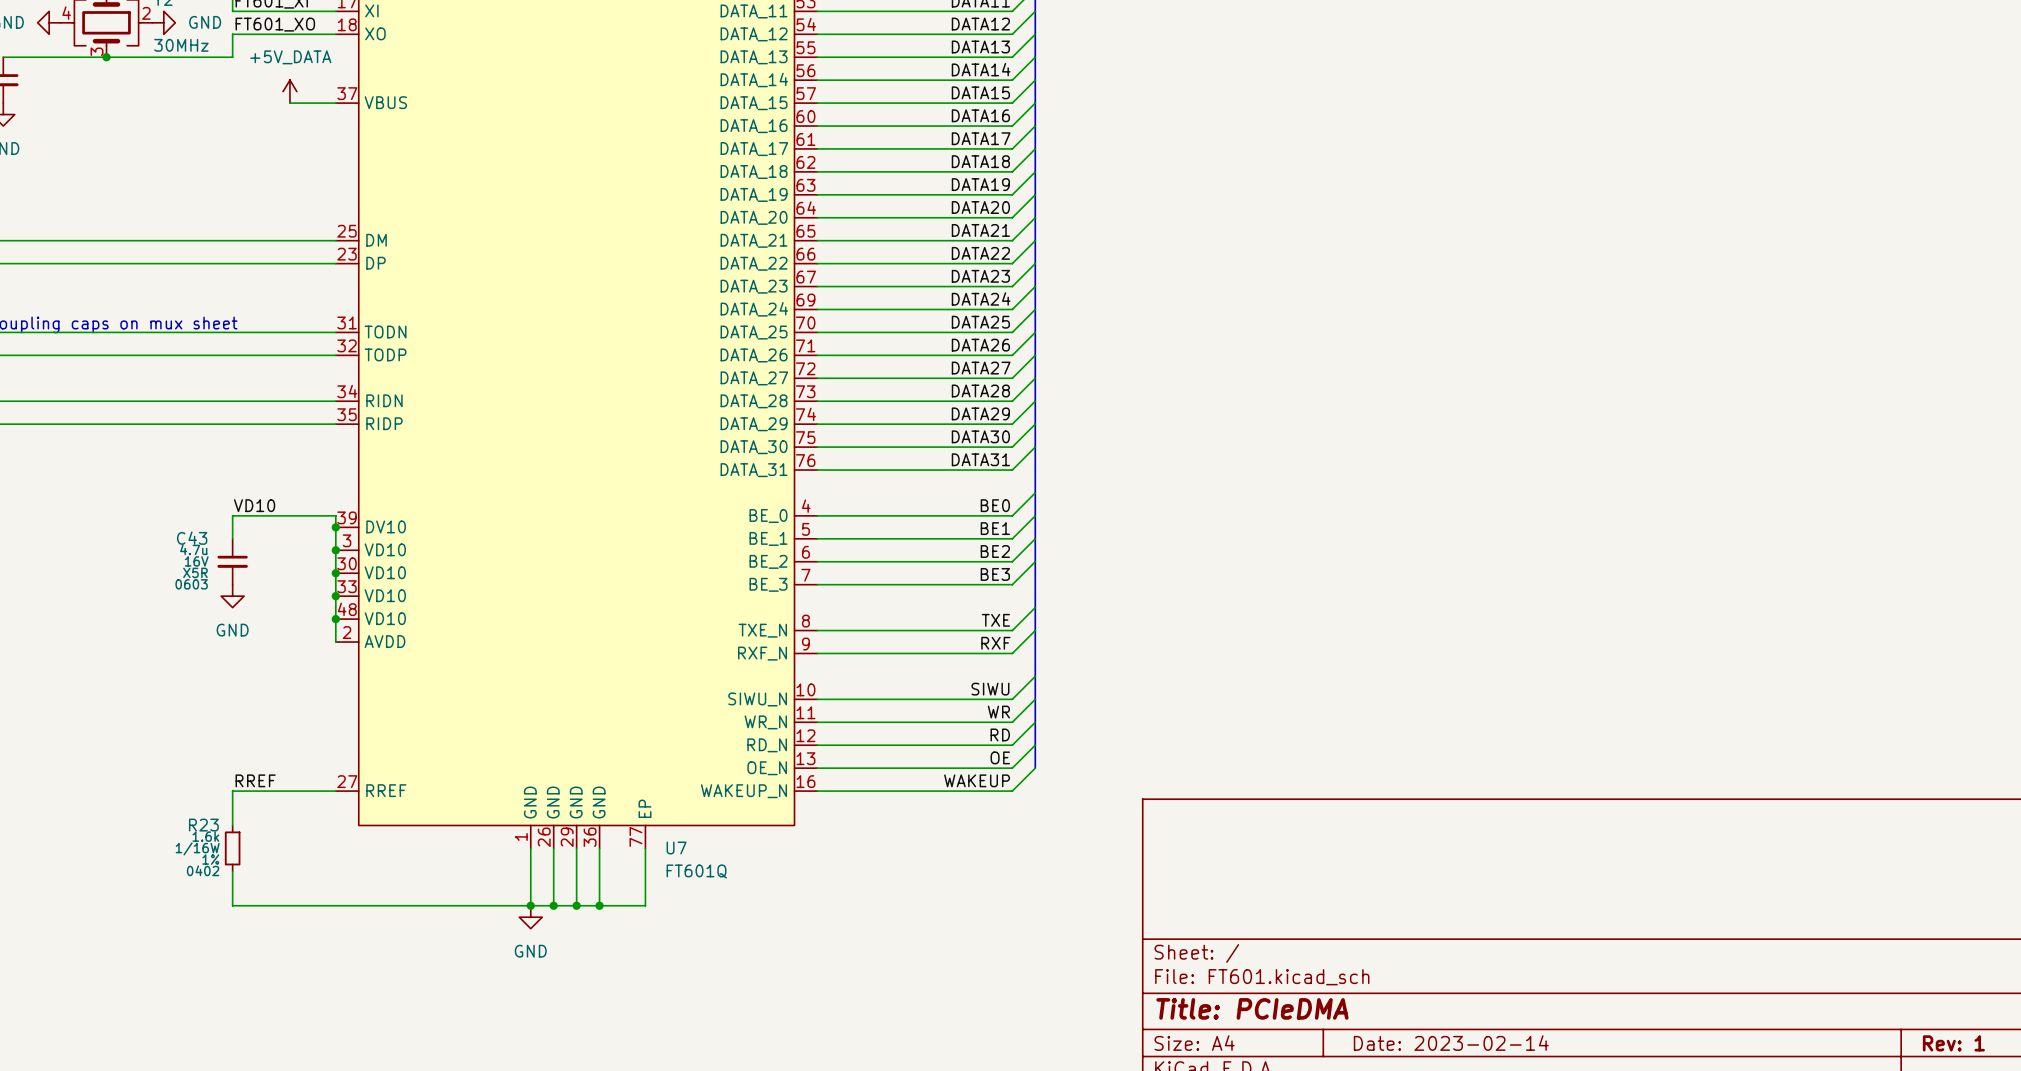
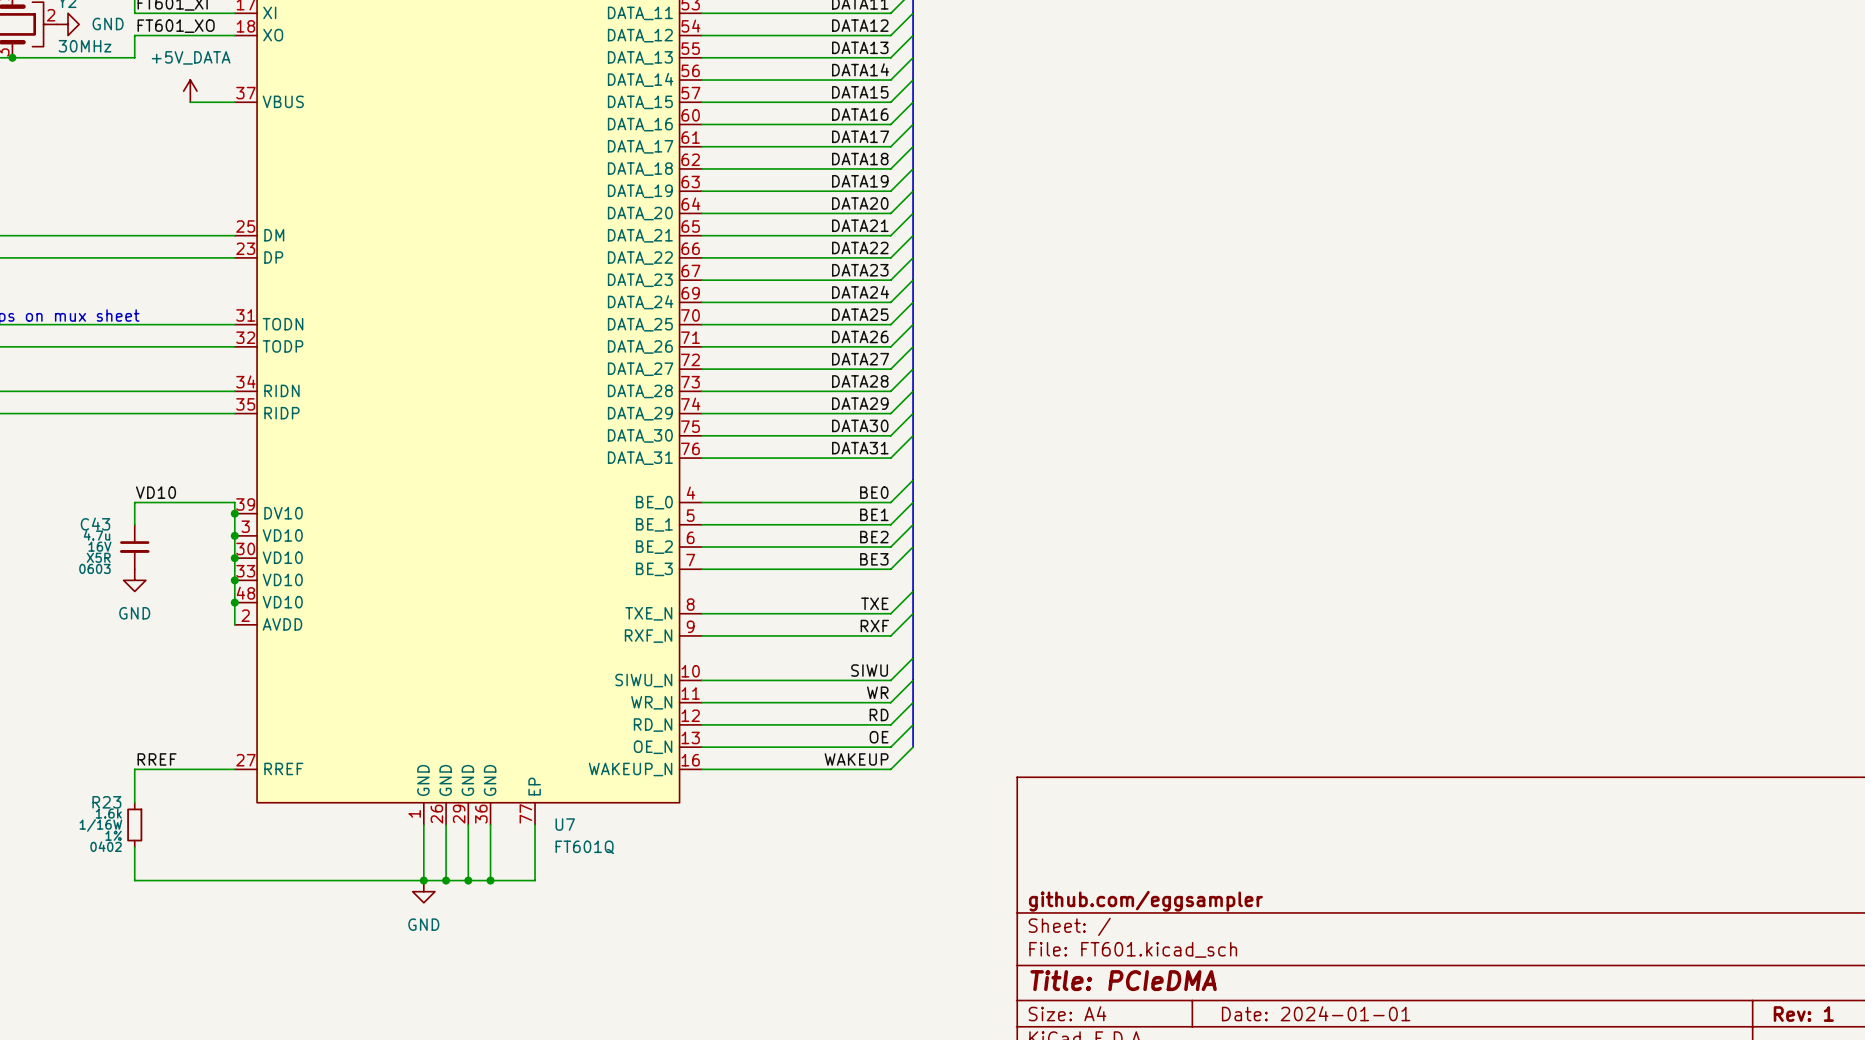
title block: none -> github.com/eggsampler (1145, 901)
title block: Date: 2023-02-14 (1451, 1043) -> Date: 2024-01-01 (1316, 1013)

